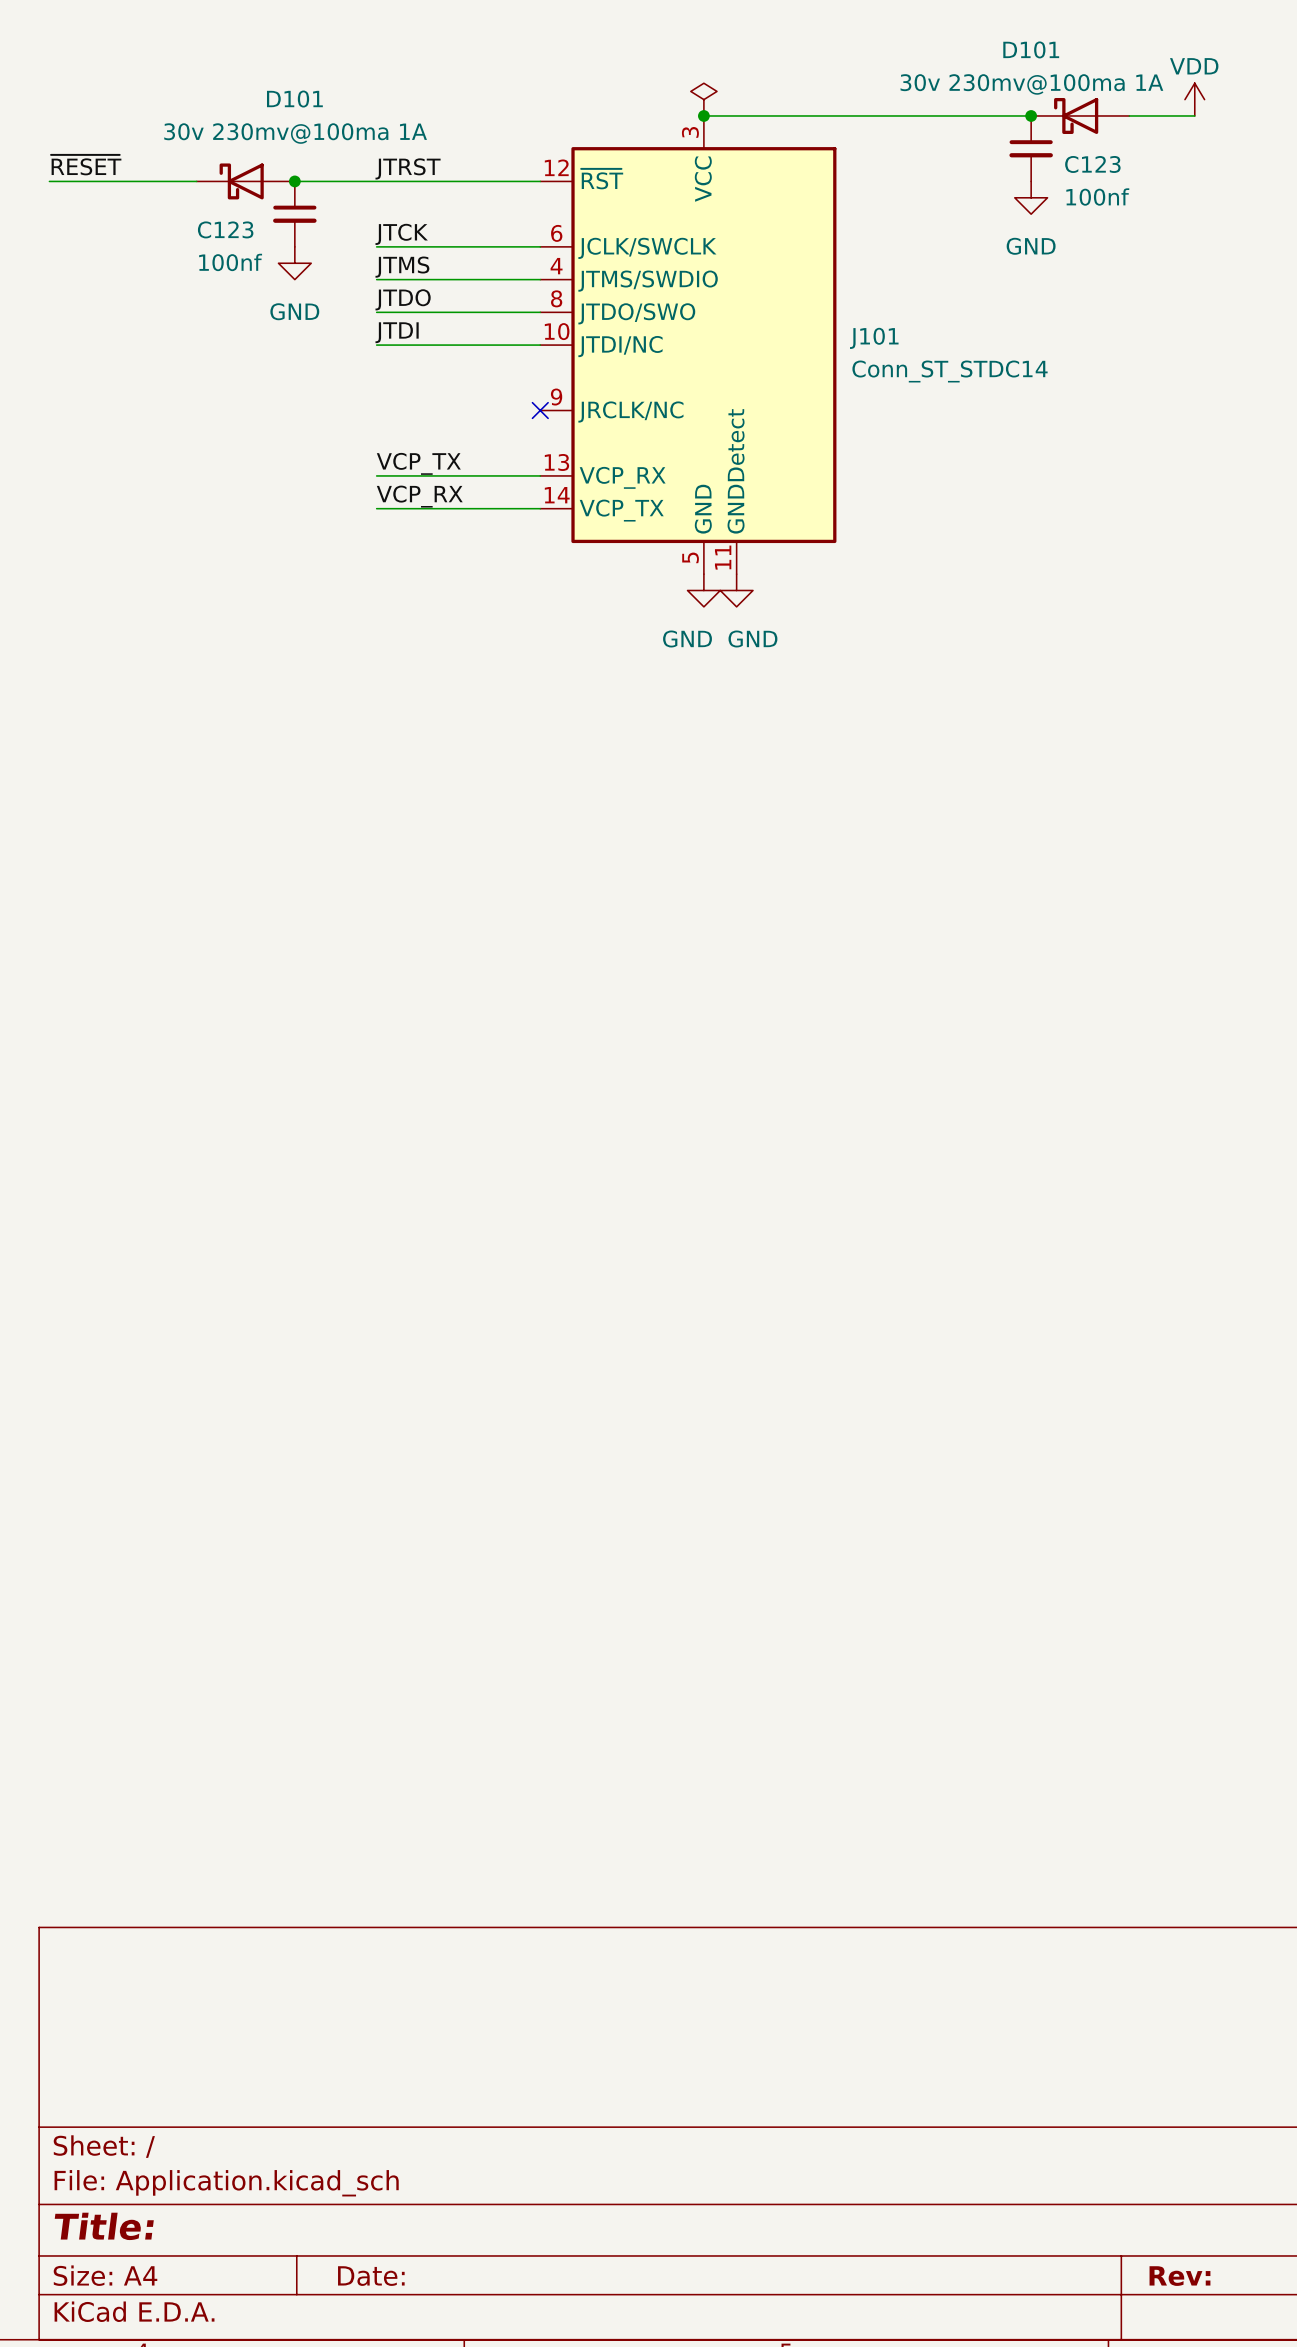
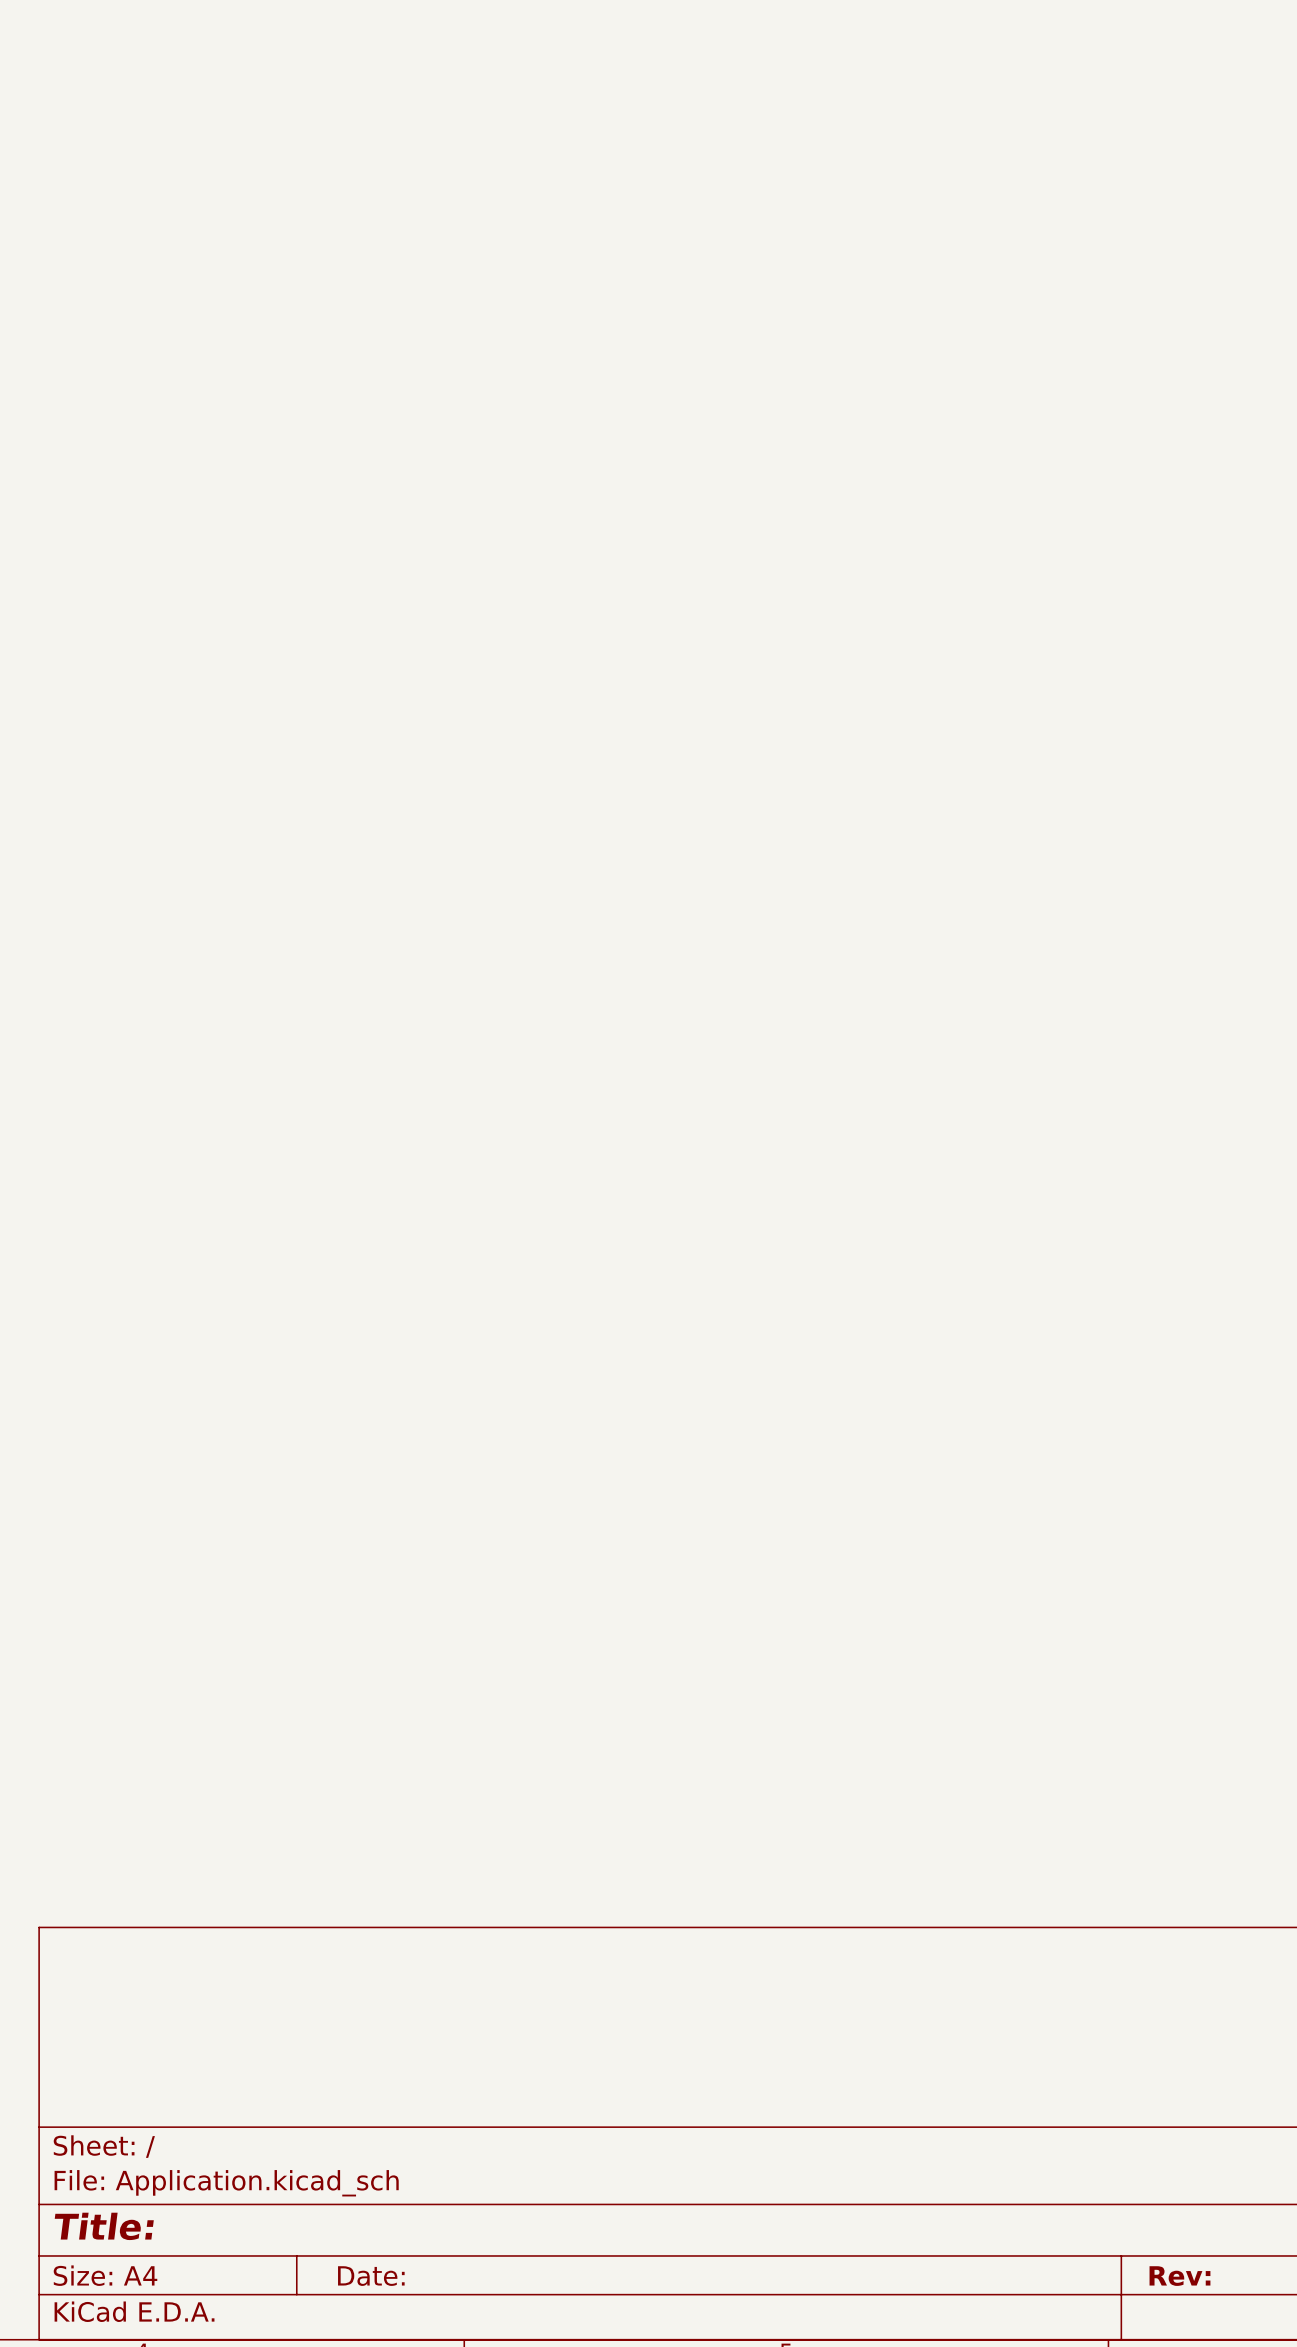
power symbol: (703, 99) -> none
power symbol: VDD (1194, 99) -> none
wire: (703, 115) (1031, 115) -> none
junction: (703, 115) -> none
junction: (1031, 115) -> none
D101: 30v 230mv@100ma 1A (1080, 115) -> none
wire: (1129, 115) (1194, 115) -> none
C123: (1031, 148) -> none
label: ~{RESET} (86, 165) -> none
label: JTRST (408, 168) -> none
wire: (49, 181) (196, 181) -> none
D101: 30v 230mv@100ma 1A (245, 181) -> none
wire: (294, 181) (540, 181) -> none
junction: (294, 181) -> none
power symbol: GND (1031, 197) -> none
C123: (294, 214) -> none
label: JTCK (401, 234) -> none
wire: (376, 246) (540, 246) -> none
power symbol: GND (294, 263) -> none
label: JTMS (402, 267) -> none
wire: (376, 279) (540, 279) -> none
label: JTDO (403, 299) -> none
wire: (376, 312) (540, 312) -> none
label: JTDI (397, 332) -> none
wire: (376, 345) (540, 345) -> none
J101: Conn_ST_STDC14 (688, 345) -> none
no-connect mark: (540, 410) -> none
label: VCP_TX (418, 463) -> none
wire: (376, 475) (540, 475) -> none
label: VCP_RX (419, 496) -> none
wire: (376, 508) (540, 508) -> none
power symbol: GND (703, 590) -> none
power symbol: GND (736, 590) -> none

